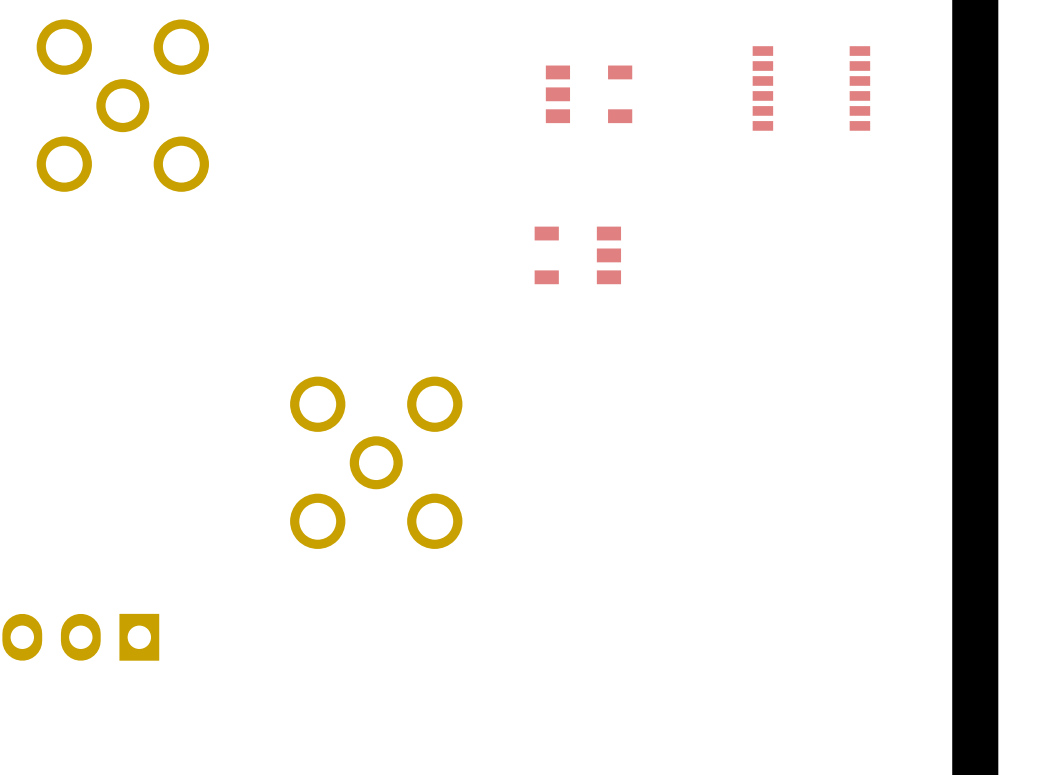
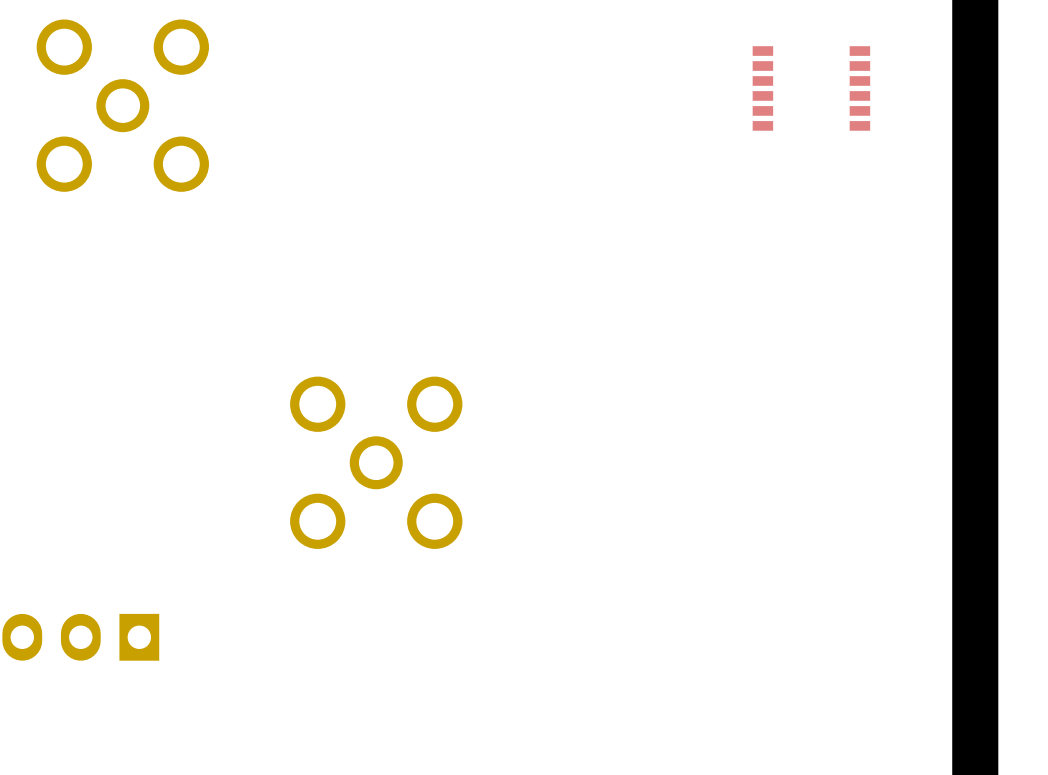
part: (589, 94) -> none
part: (577, 255) -> none

